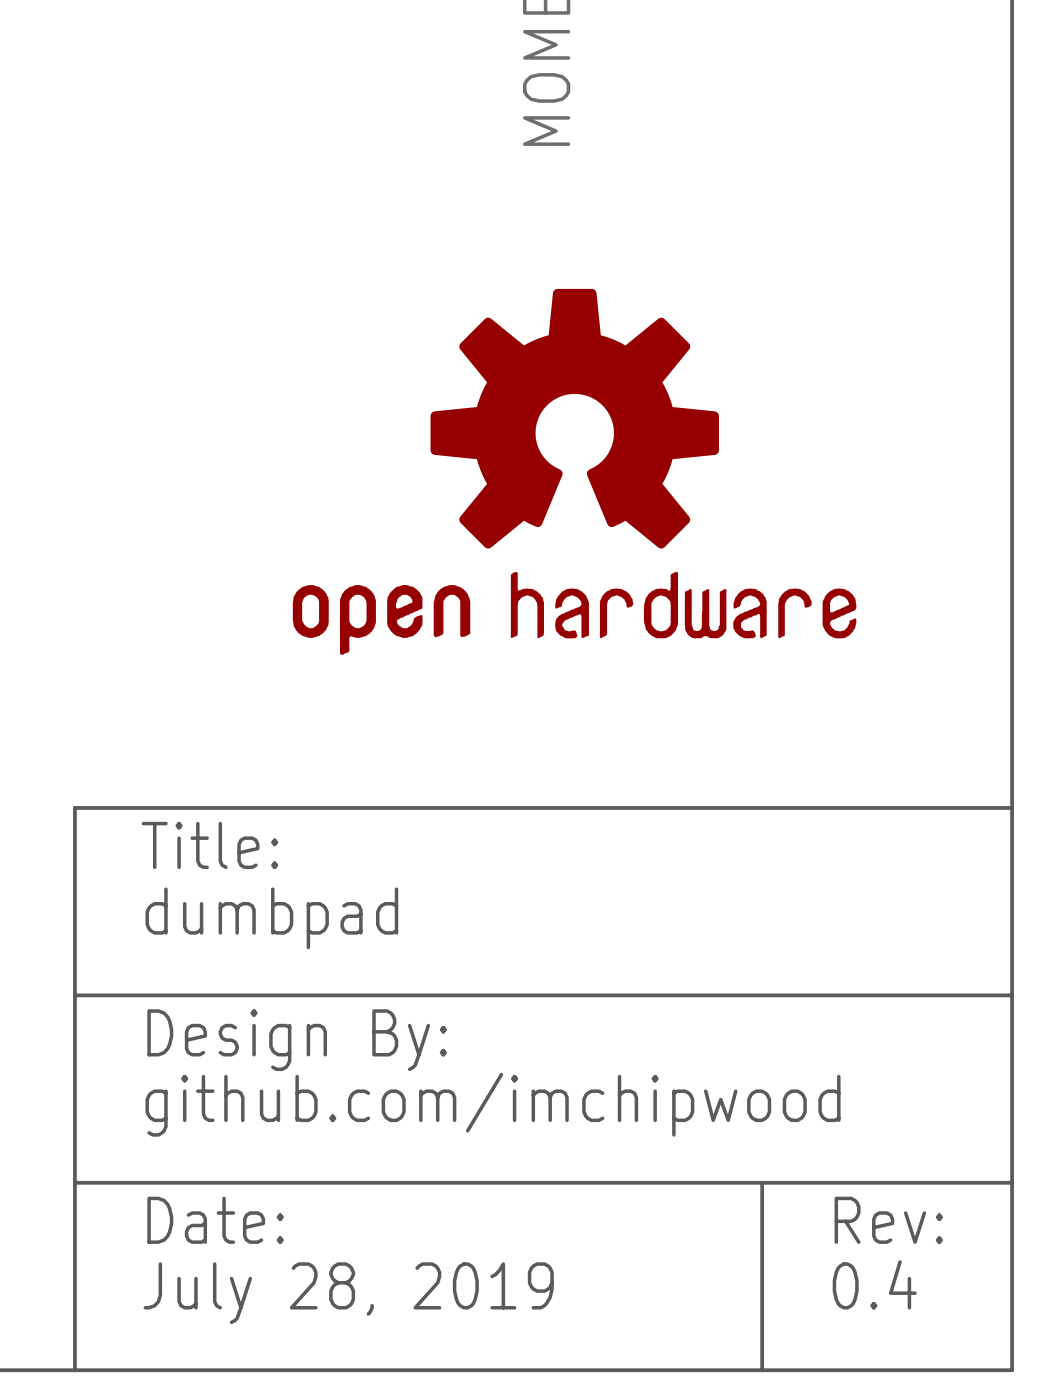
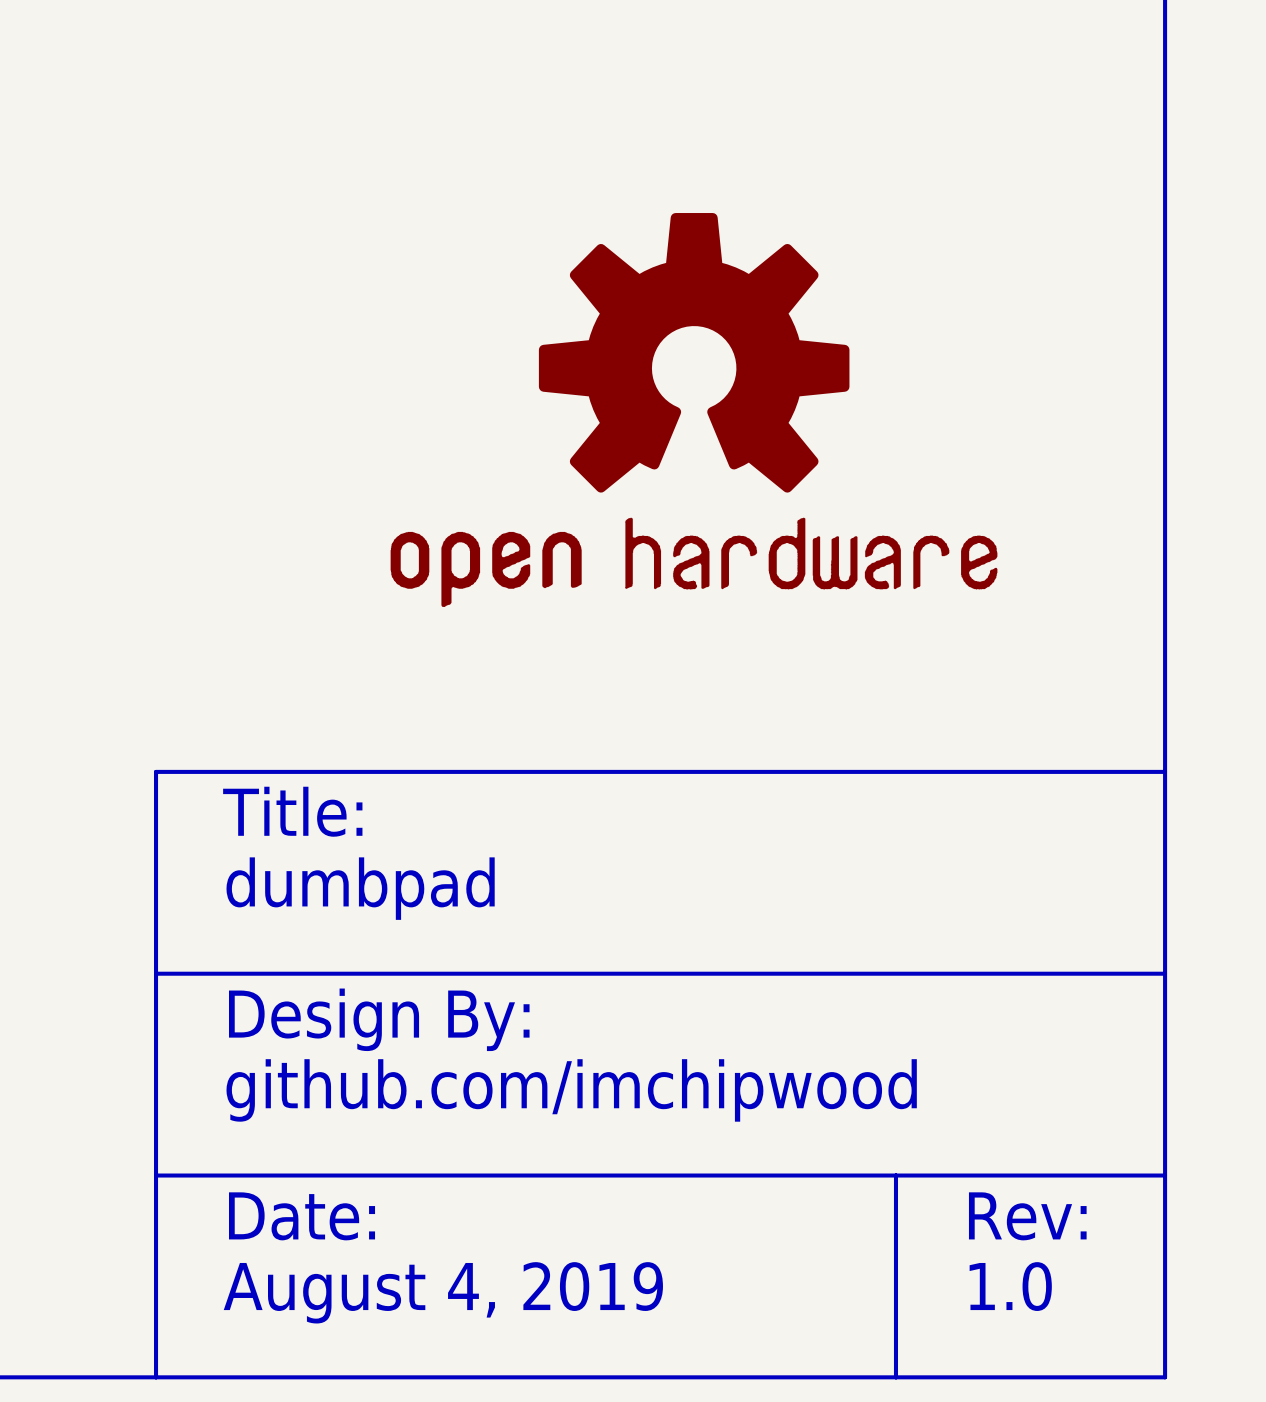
text: 0.4 (874, 1284) -> 1.0 (1010, 1286)
text: July 28, 2019 (348, 1293) -> August 4, 2019 (443, 1292)

